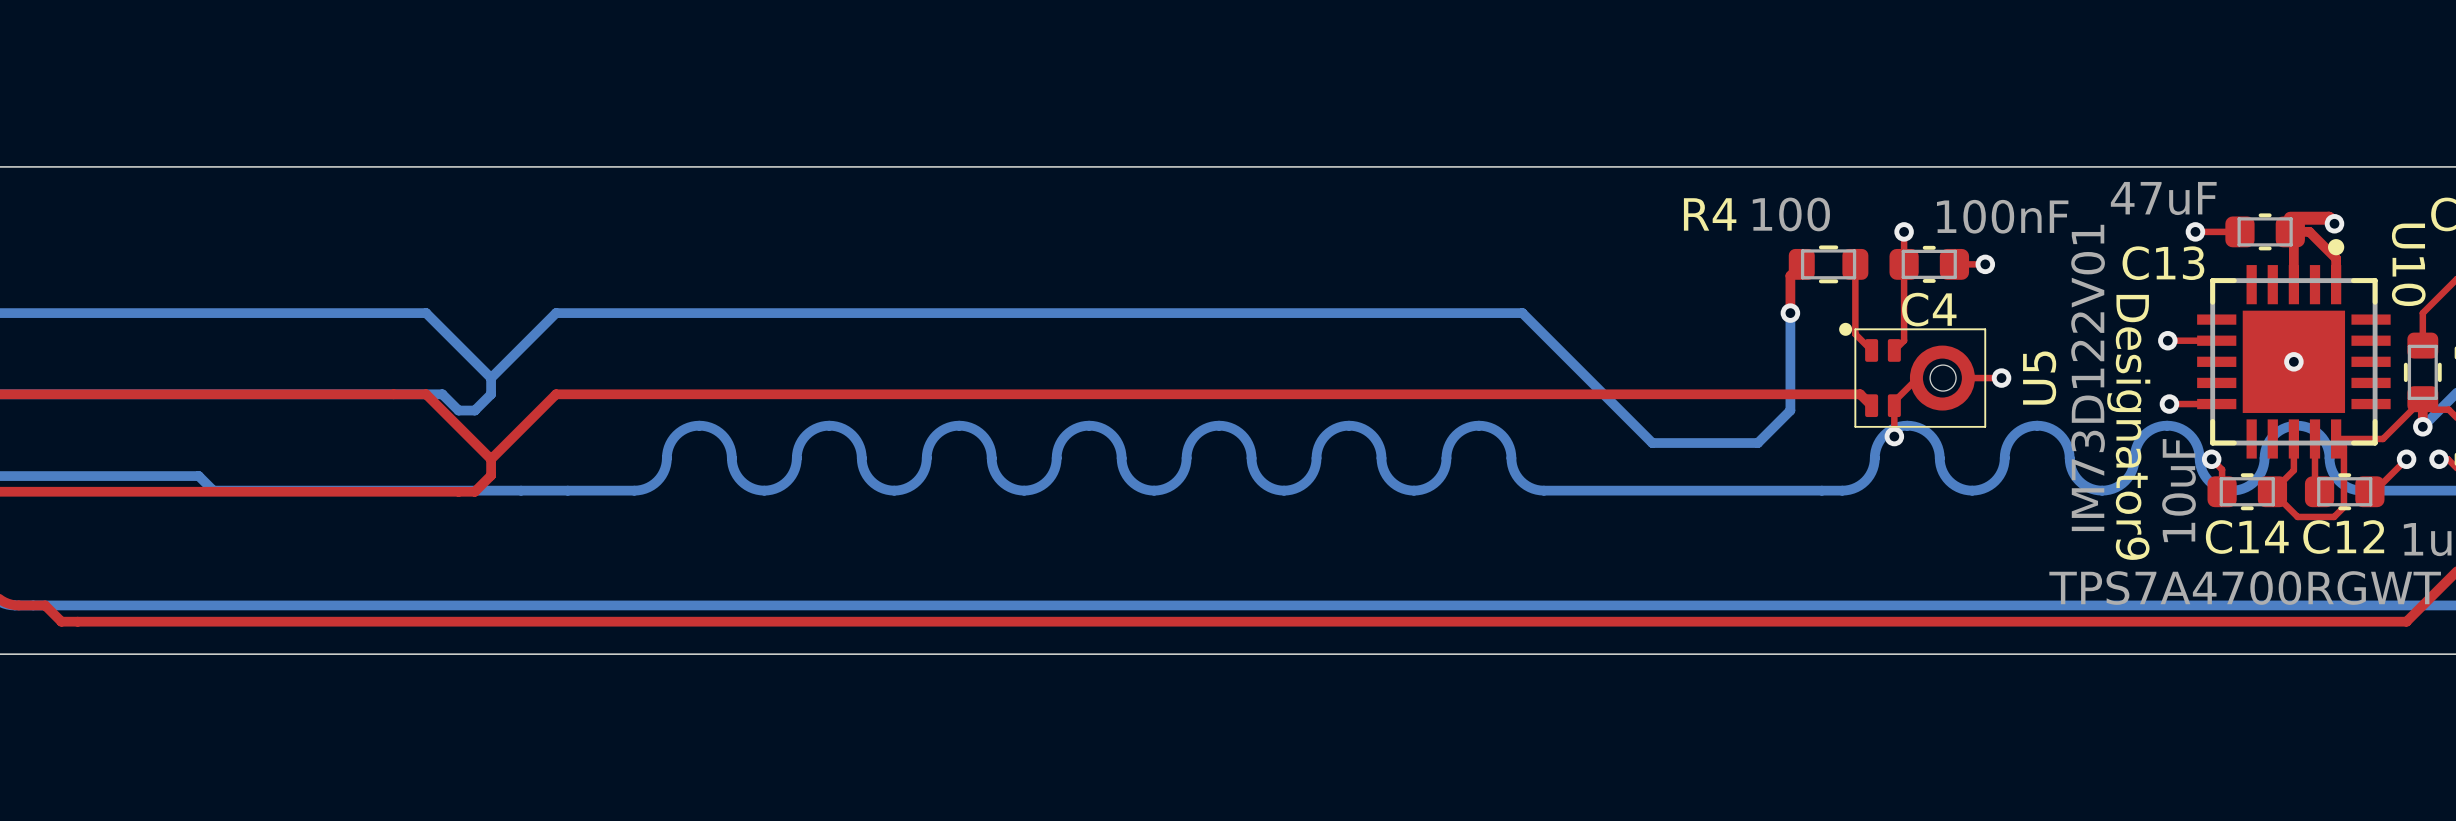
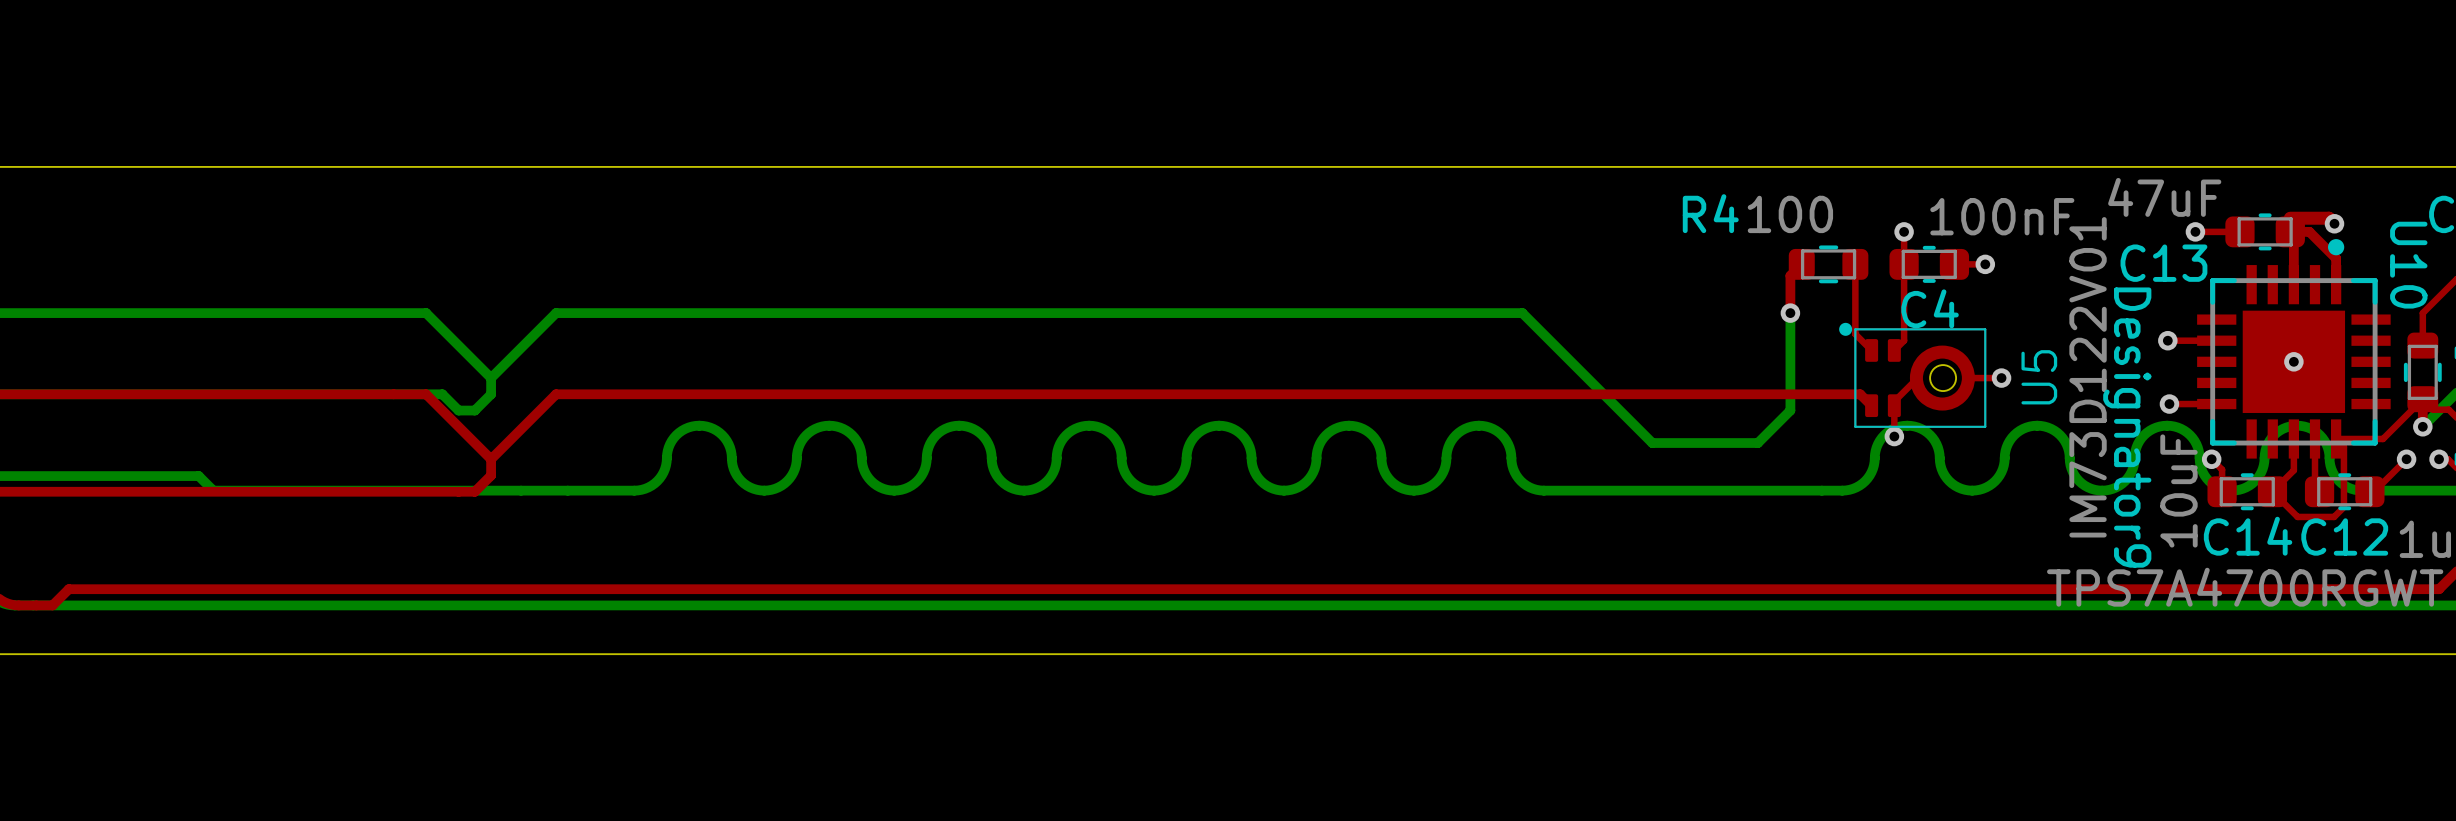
top track: (2439, 589) (2406, 621) (61, 621) (45, 605) -> (2439, 589) (68, 589) (52, 605) (45, 605)

